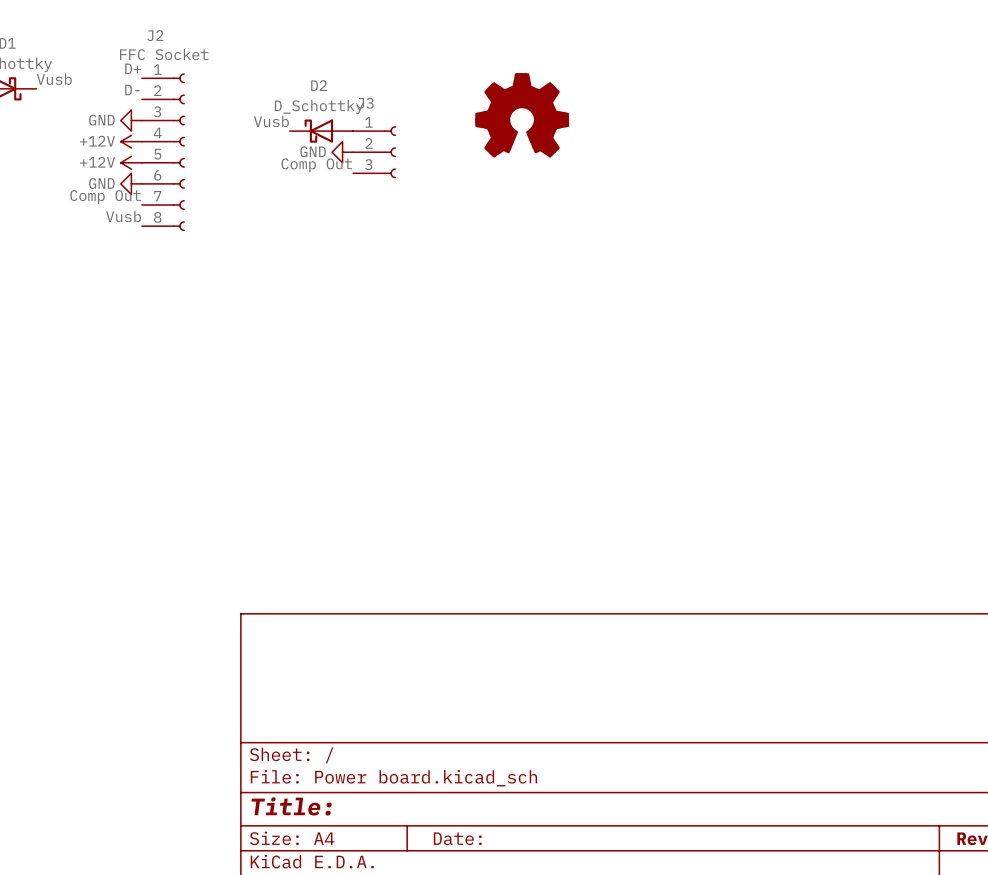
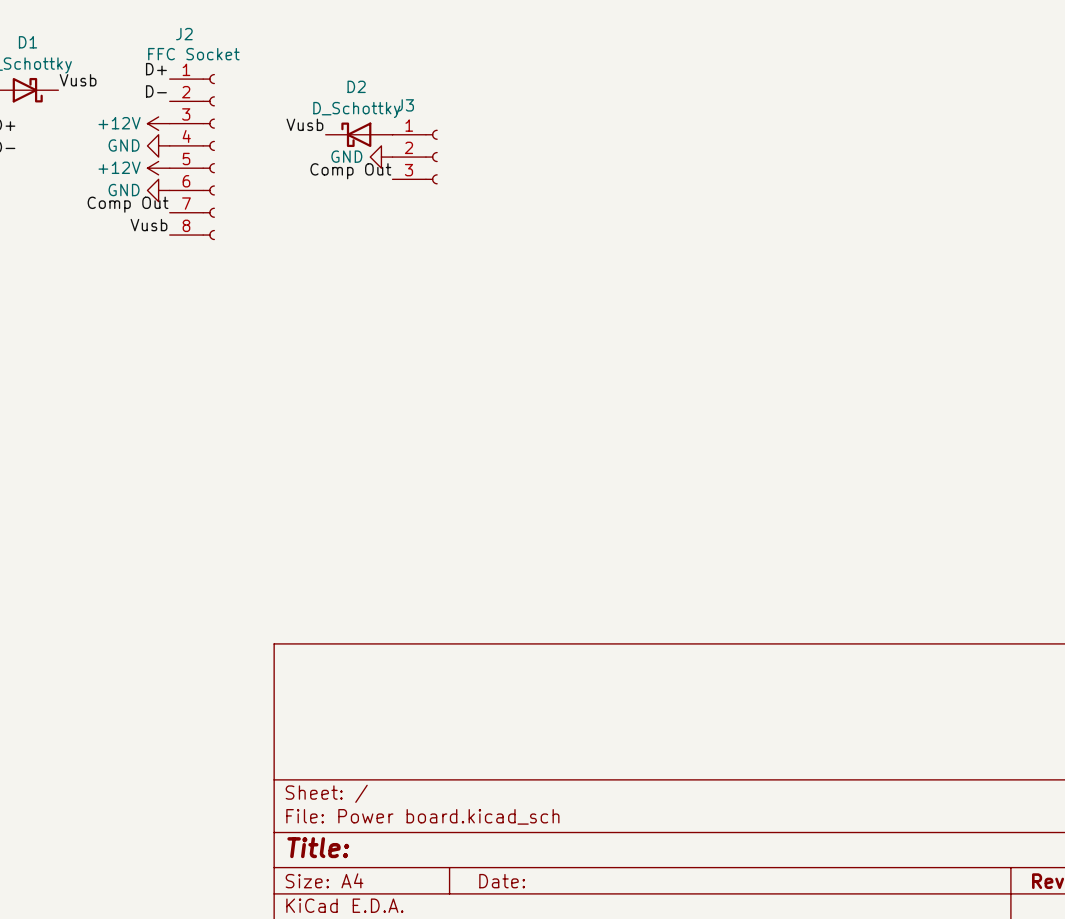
part: (522, 115) -> none
power symbol: GND (131, 120) -> +12V (158, 123)
power symbol: +12V (131, 141) -> GND (158, 145)

